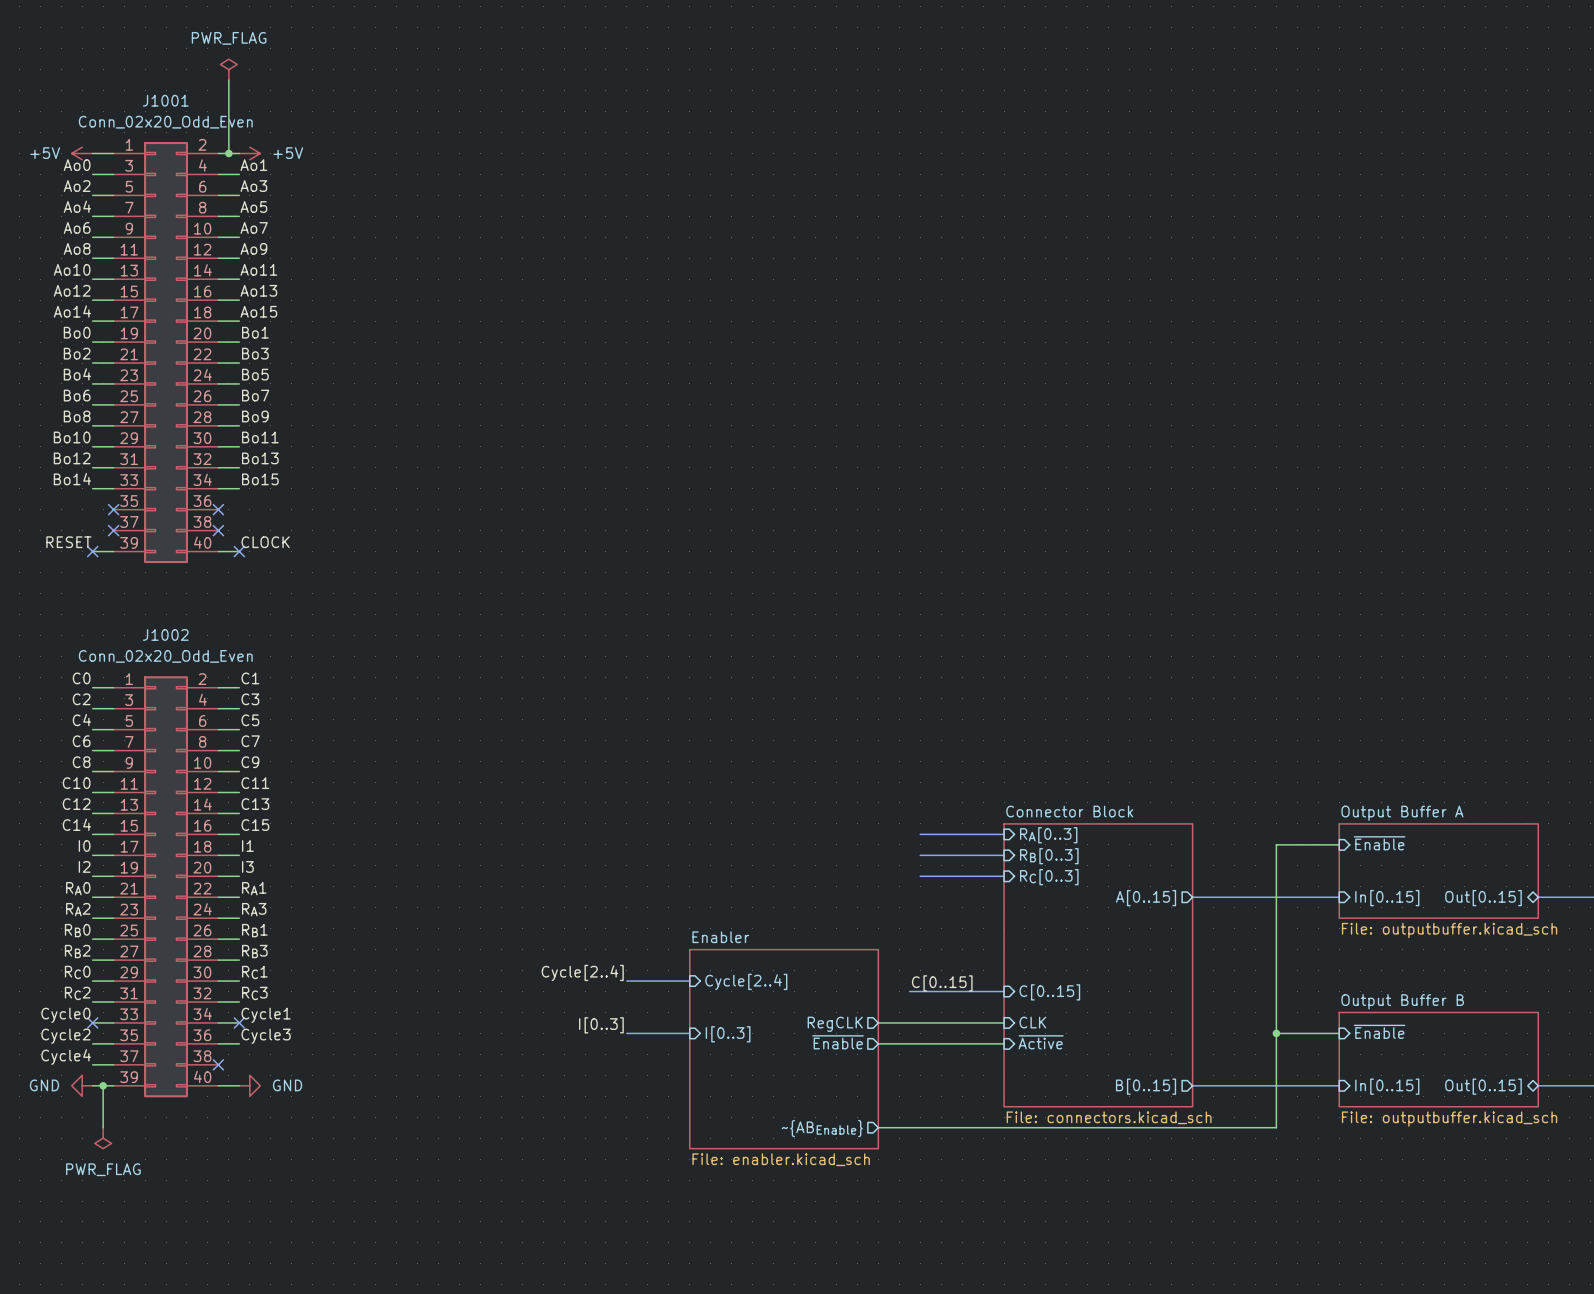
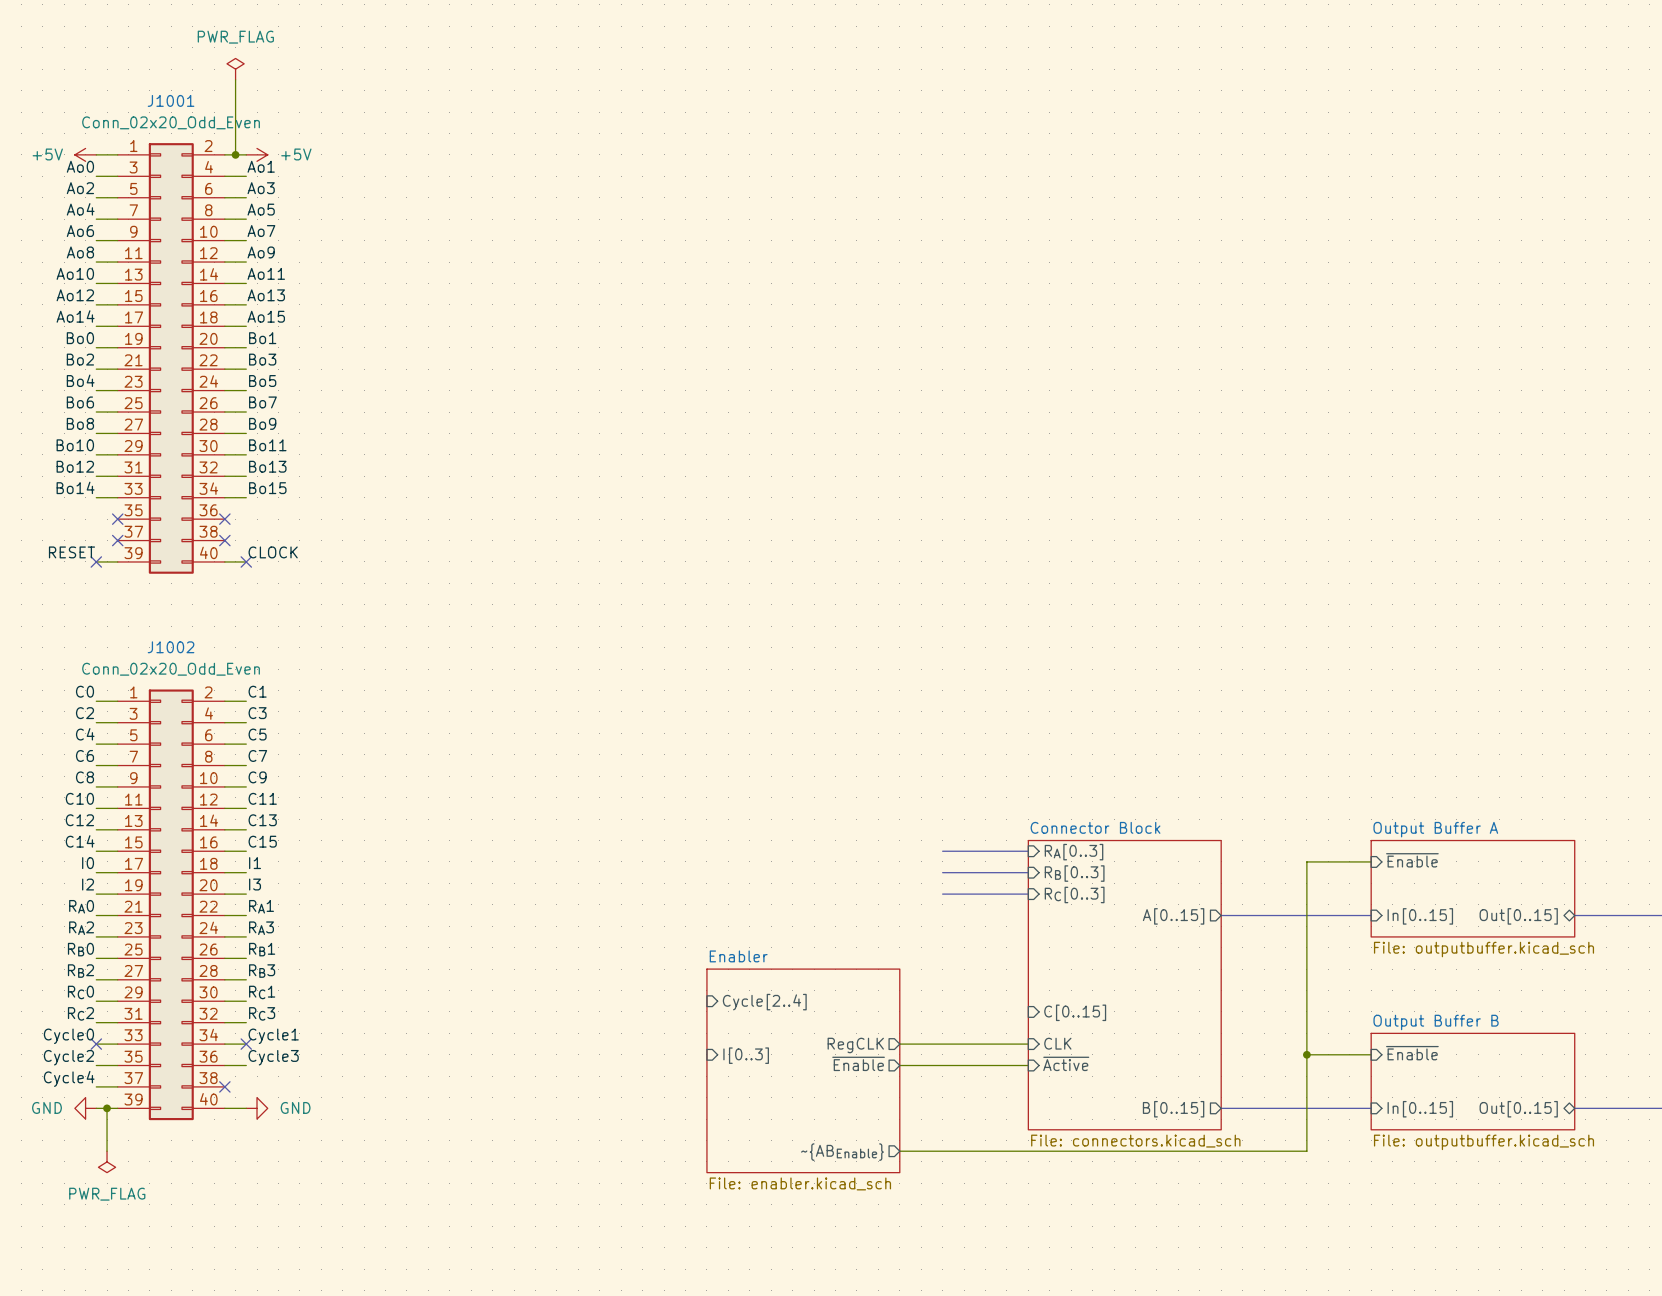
label: Cycle[2..4] (582, 972) -> none
bus: (626, 981) (689, 981) -> none
label: C[0..15] (942, 983) -> none
bus: (909, 991) (1004, 991) -> none
label: I[0..3] (601, 1025) -> none
bus: (626, 1033) (689, 1033) -> none

